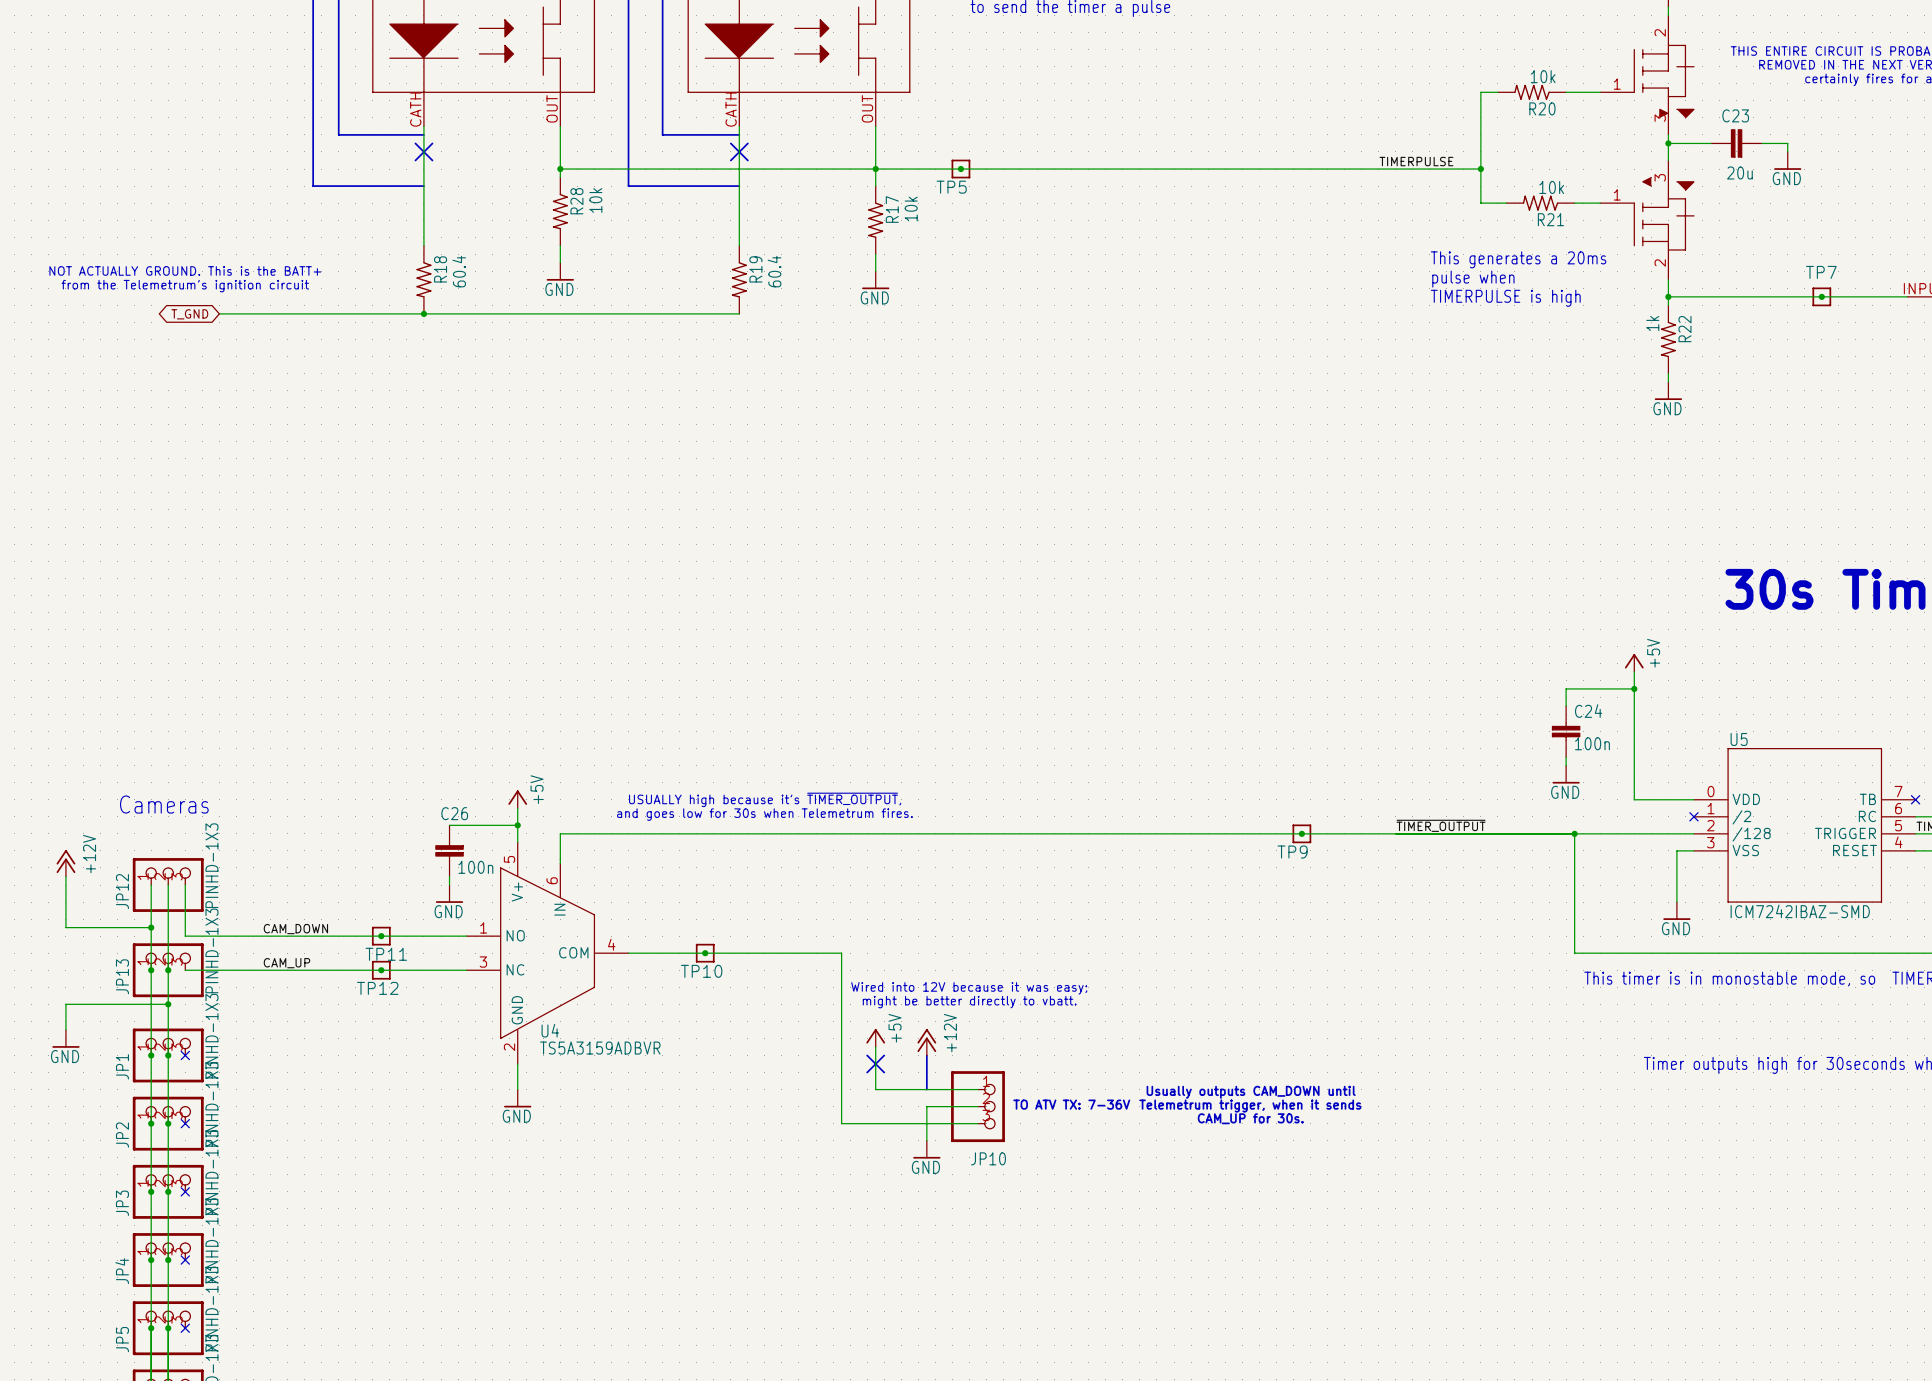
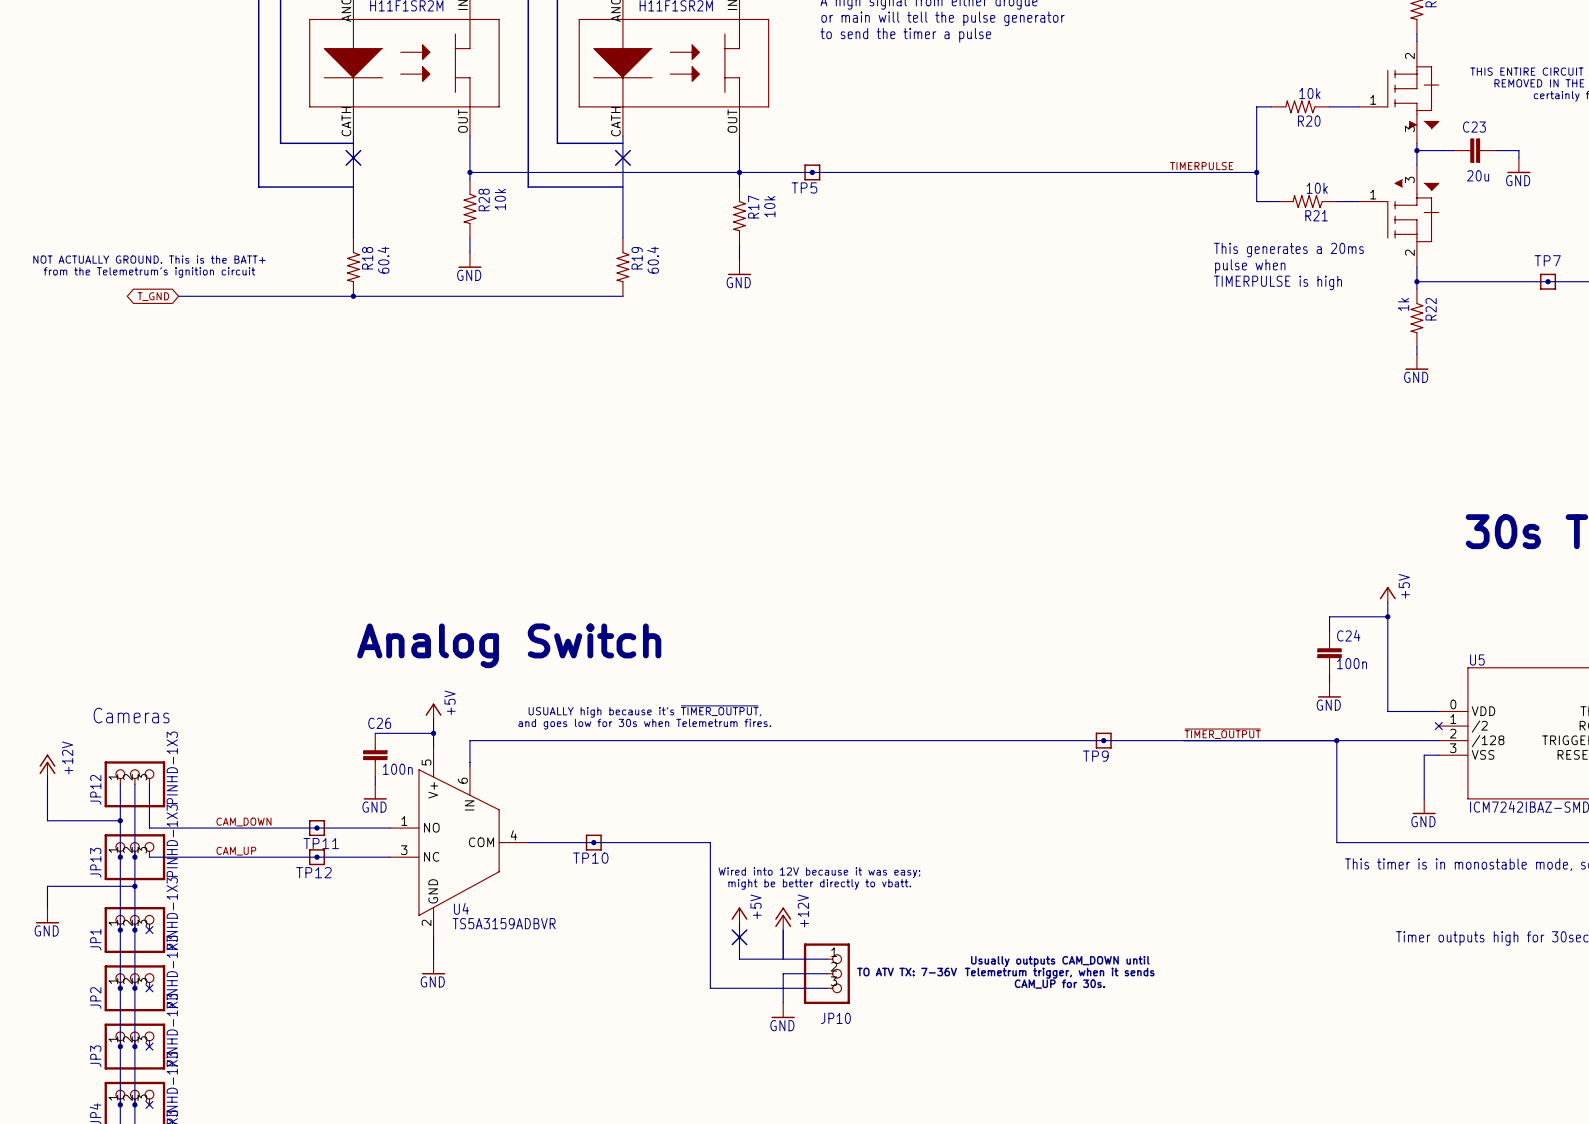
text: none -> Analog Switch (509, 645)

